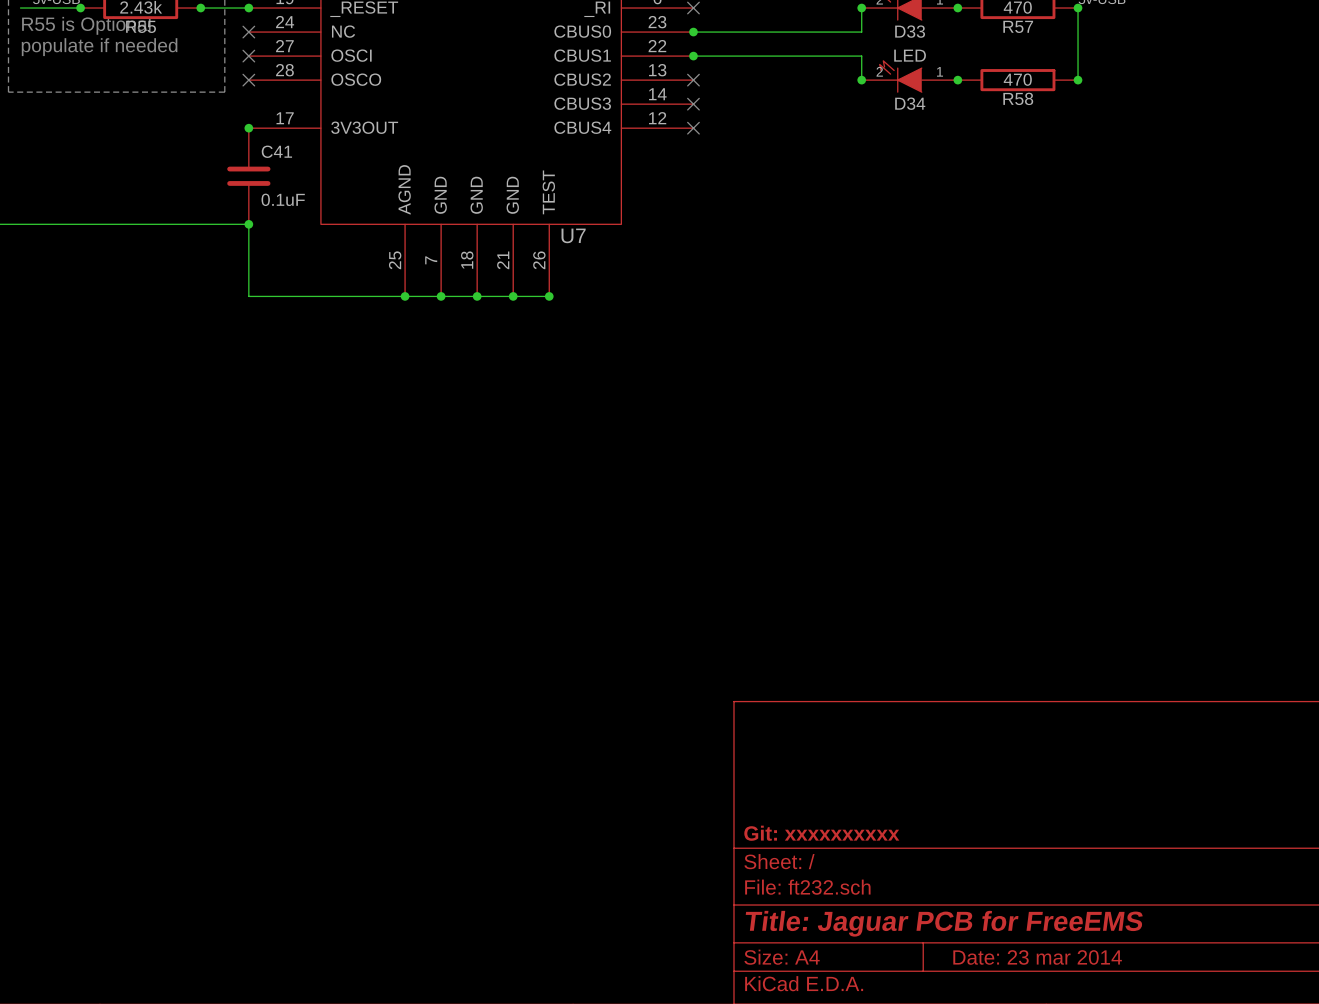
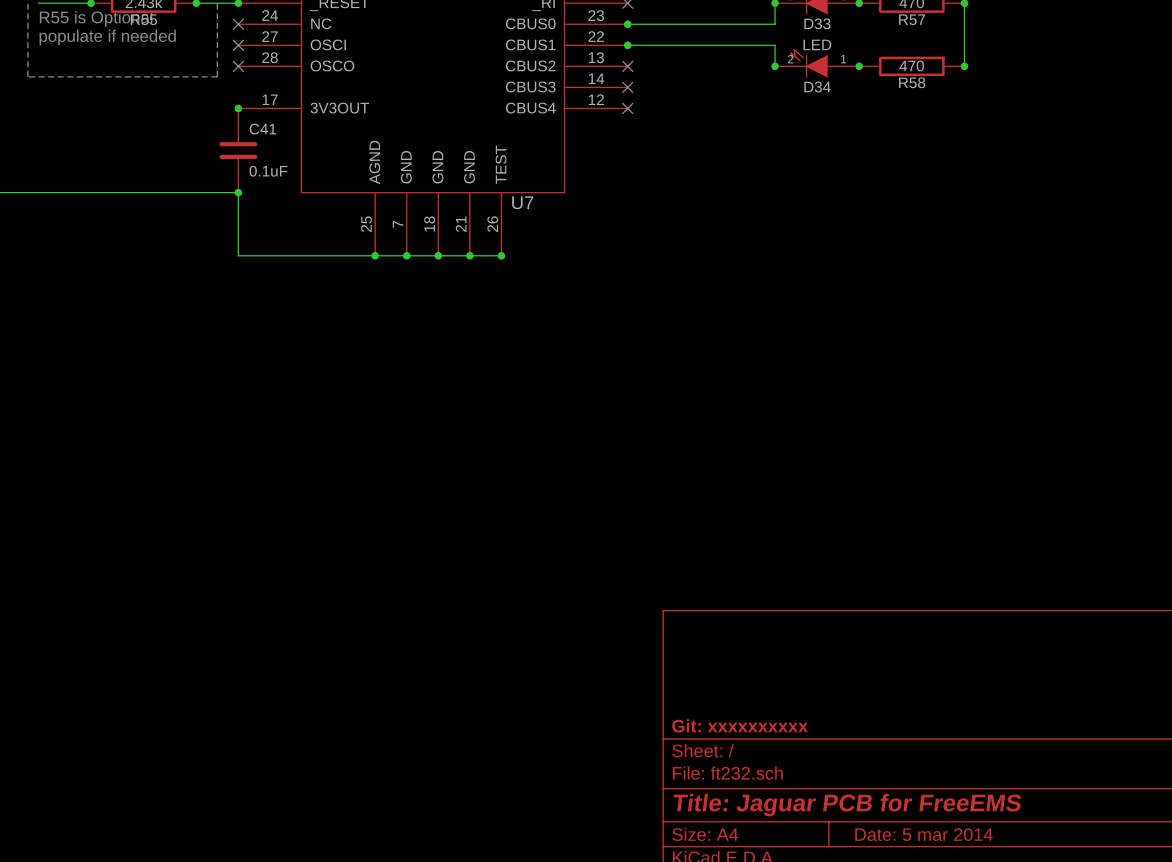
title block: Date: 23 mar 2014 (1037, 957) -> Date: 5 mar 2014 (924, 834)

